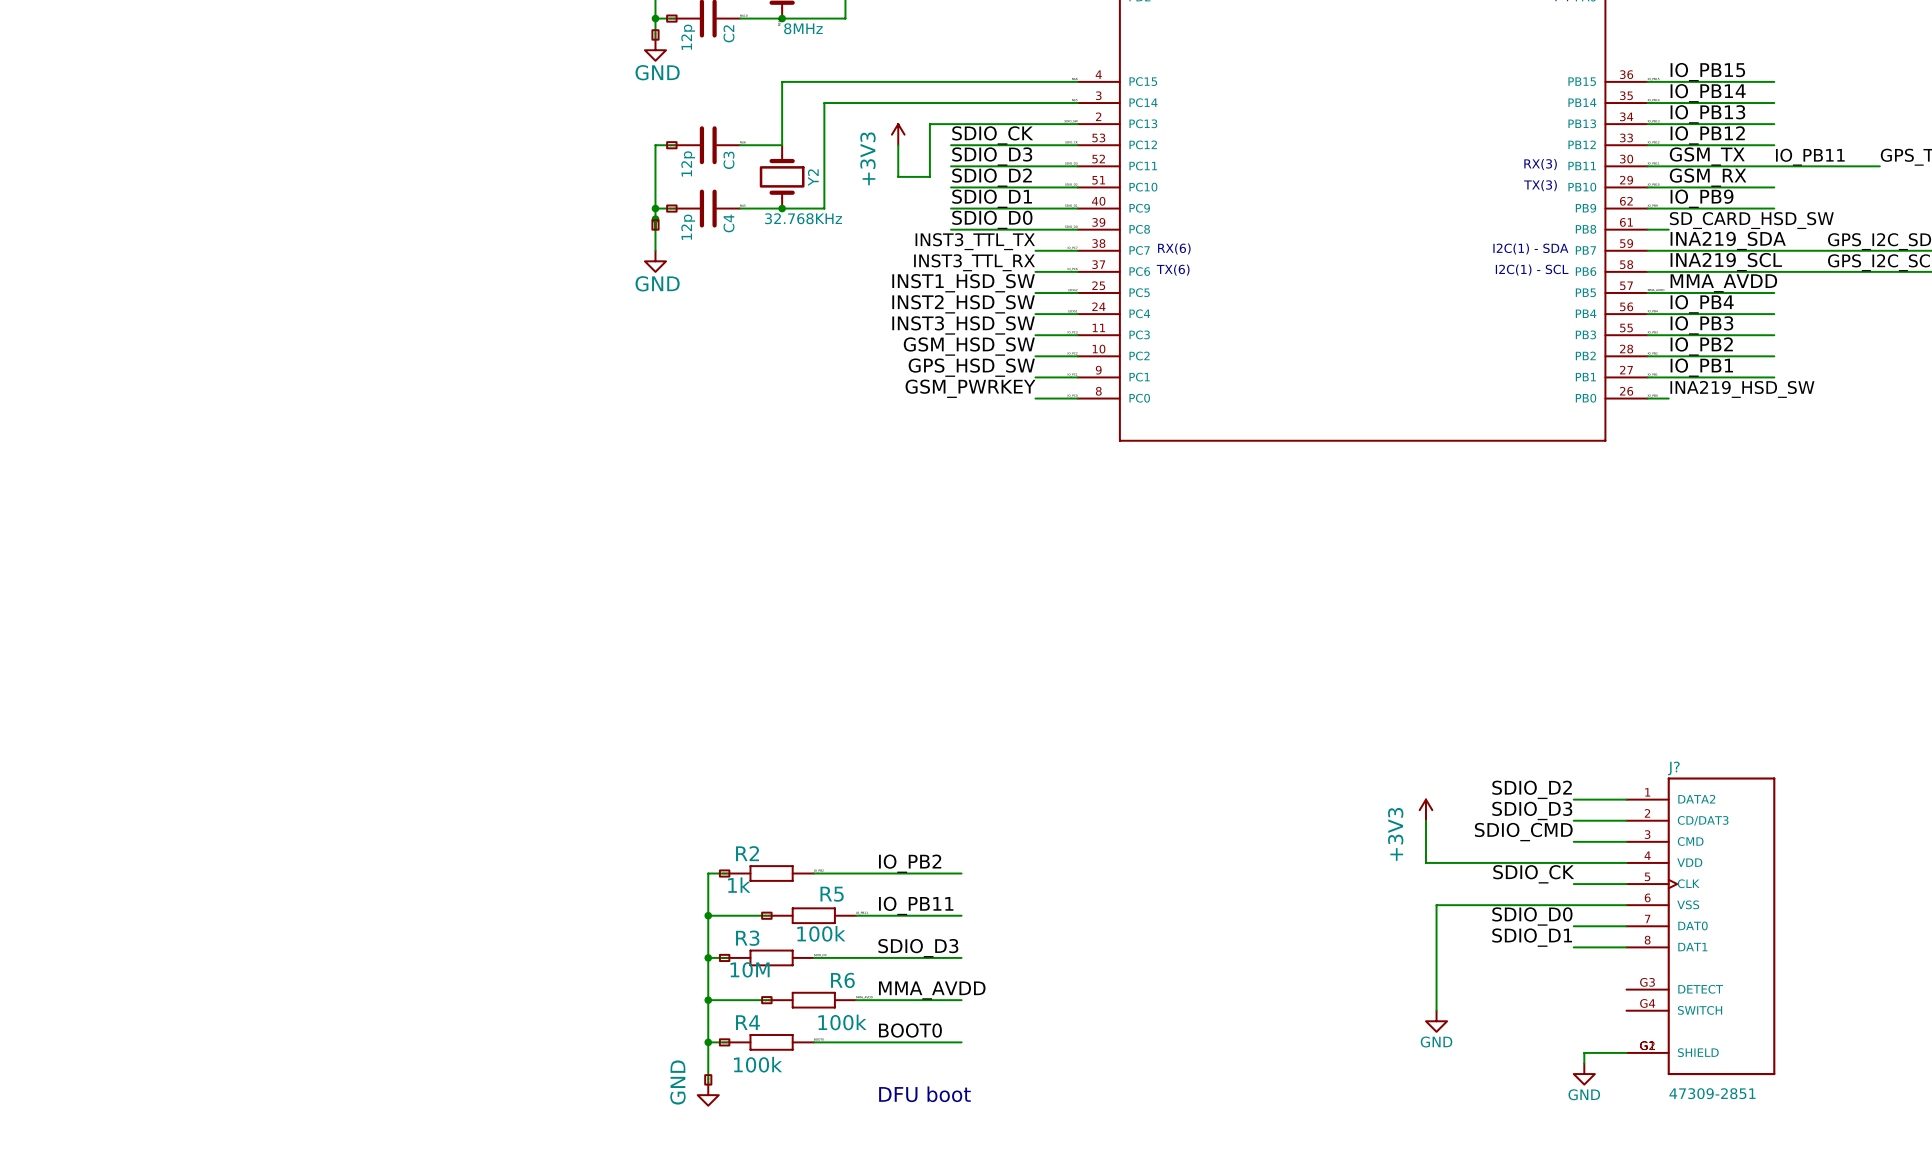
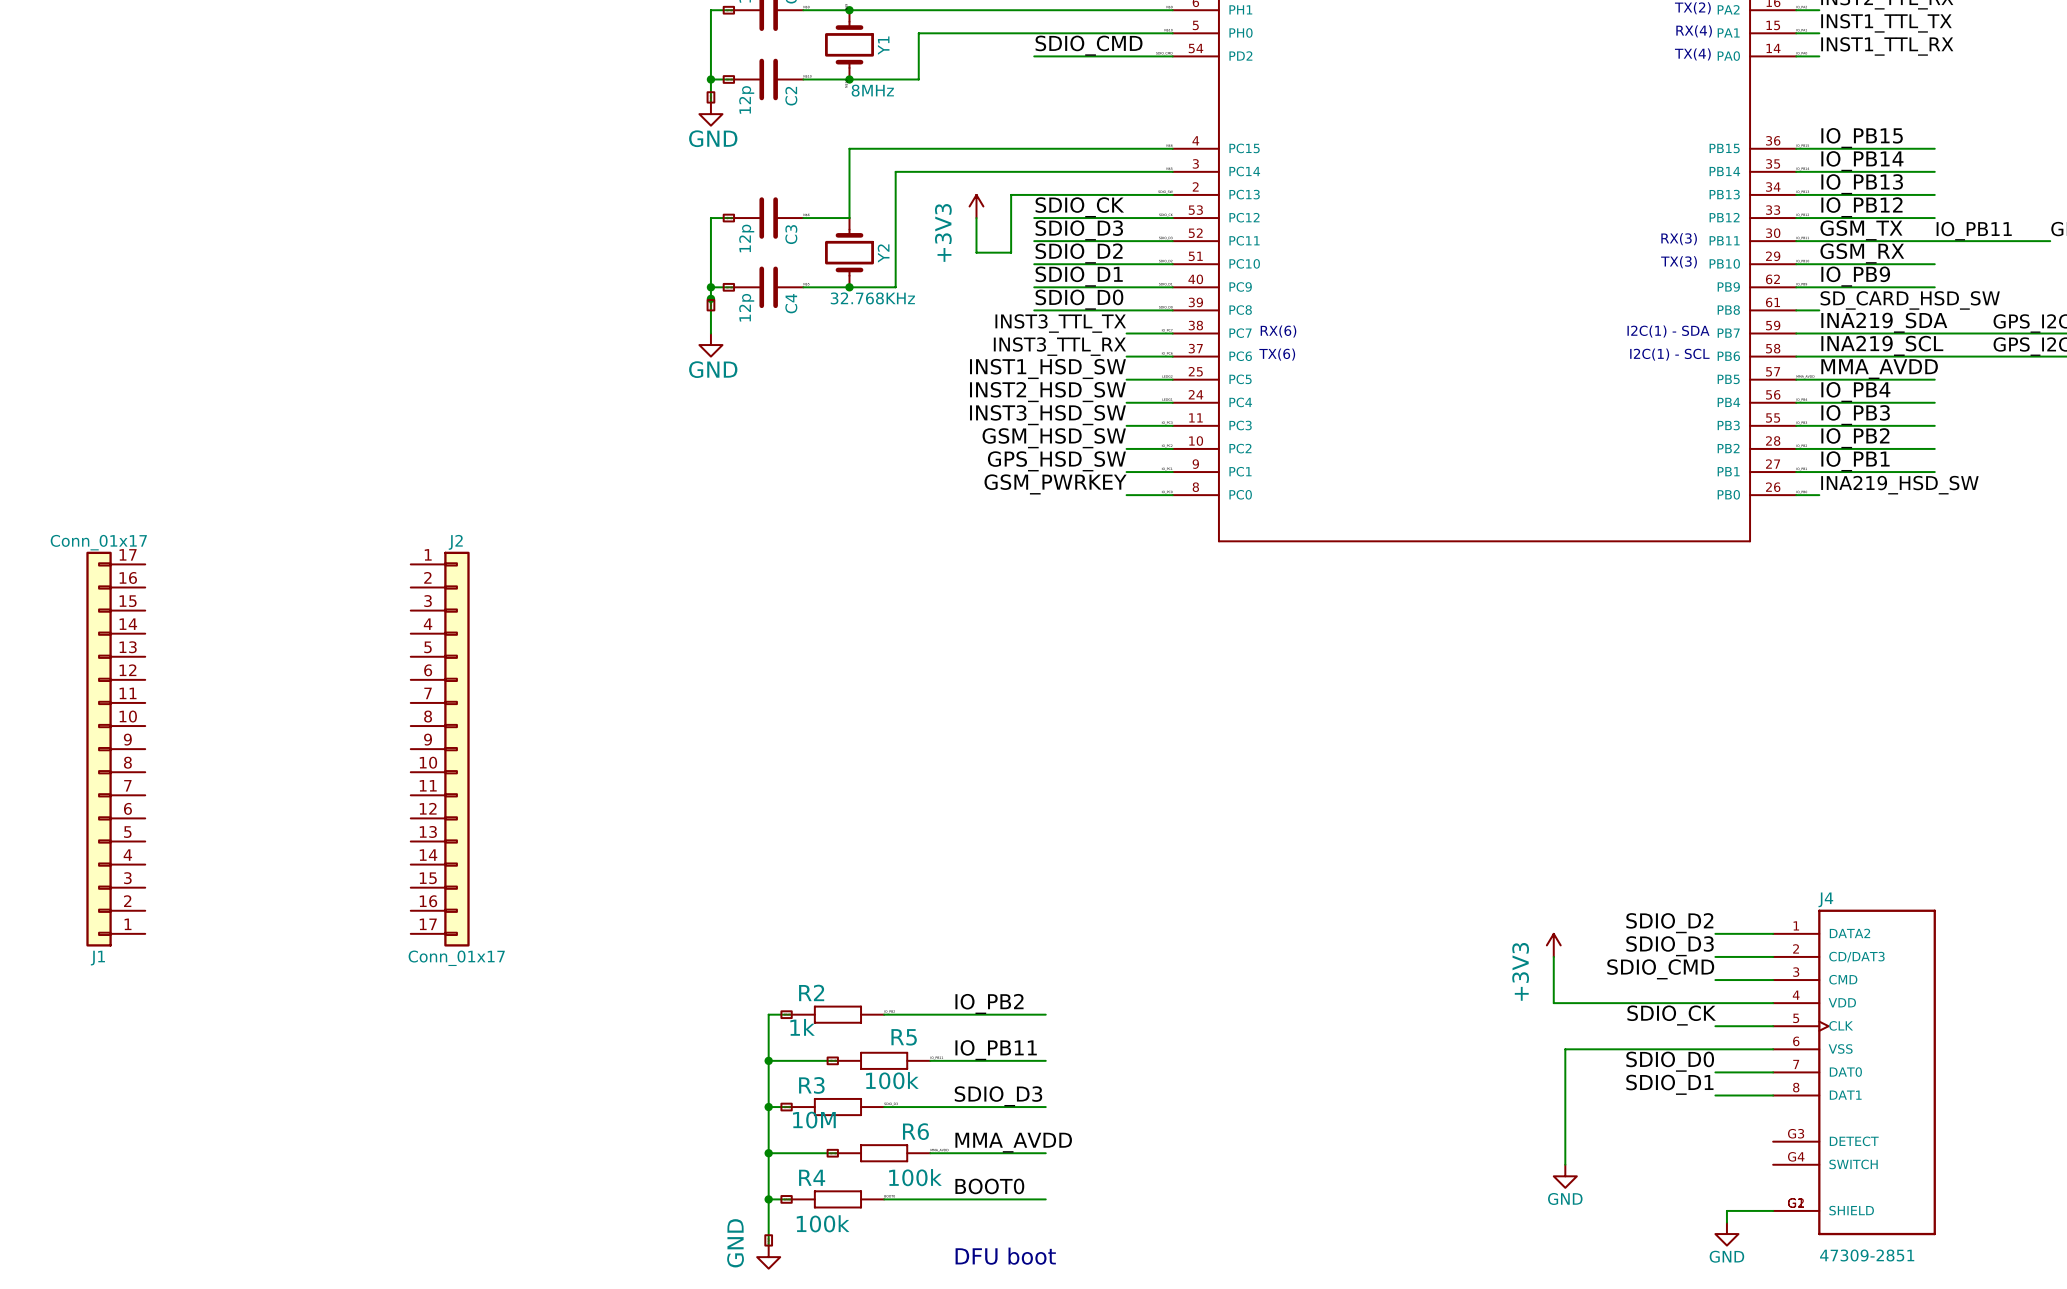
J1: none -> Conn_01x17 (115, 749)
J2: none -> Conn_01x17 (440, 749)
J? name: J? (1673, 768) -> J4 (1825, 899)

